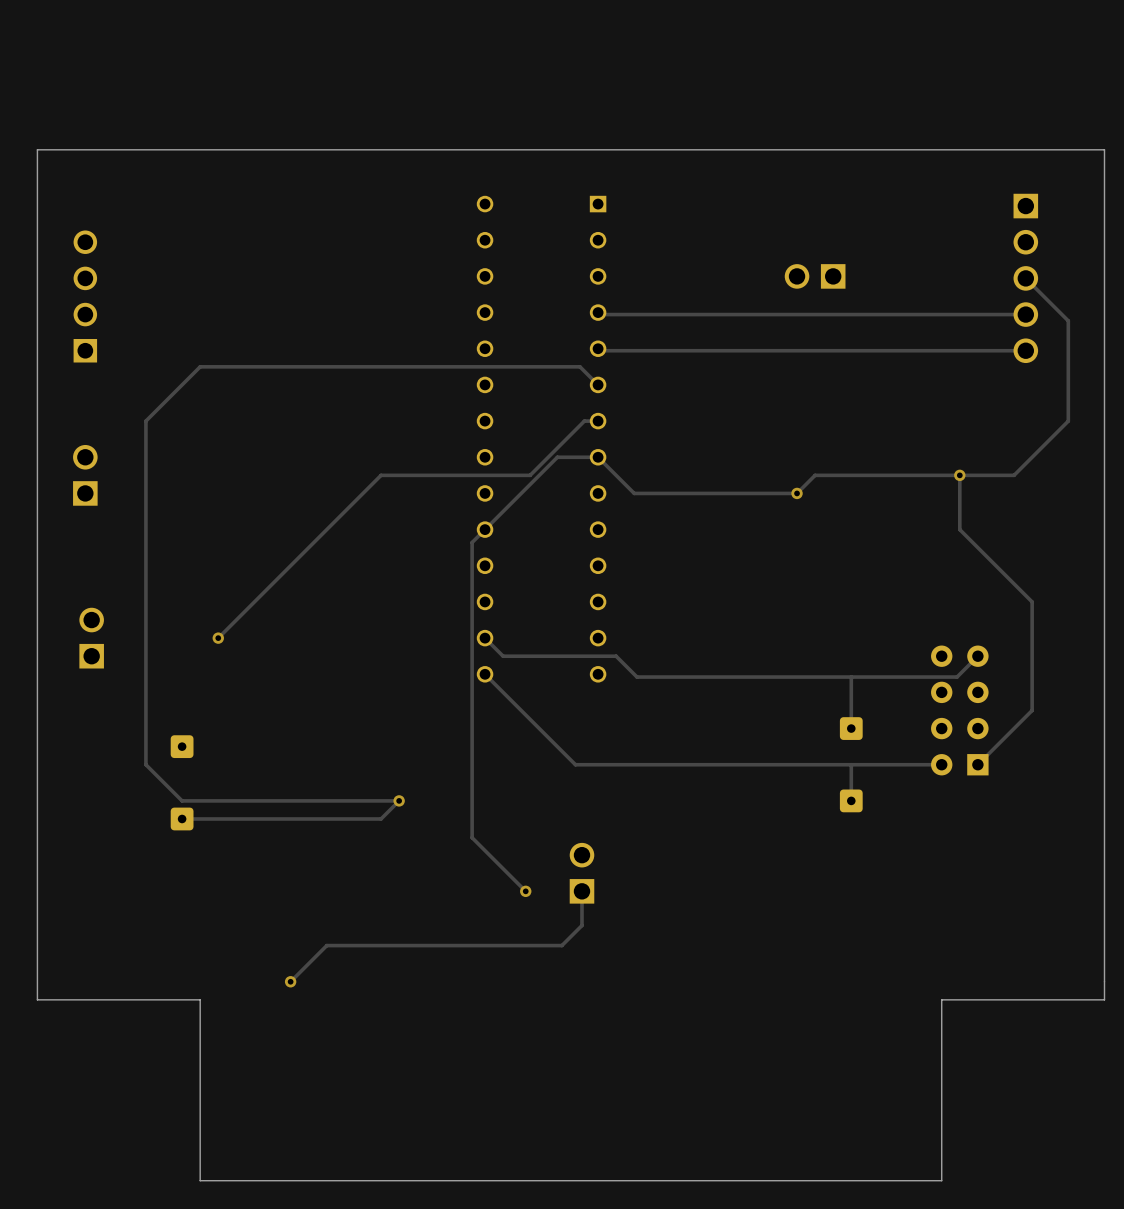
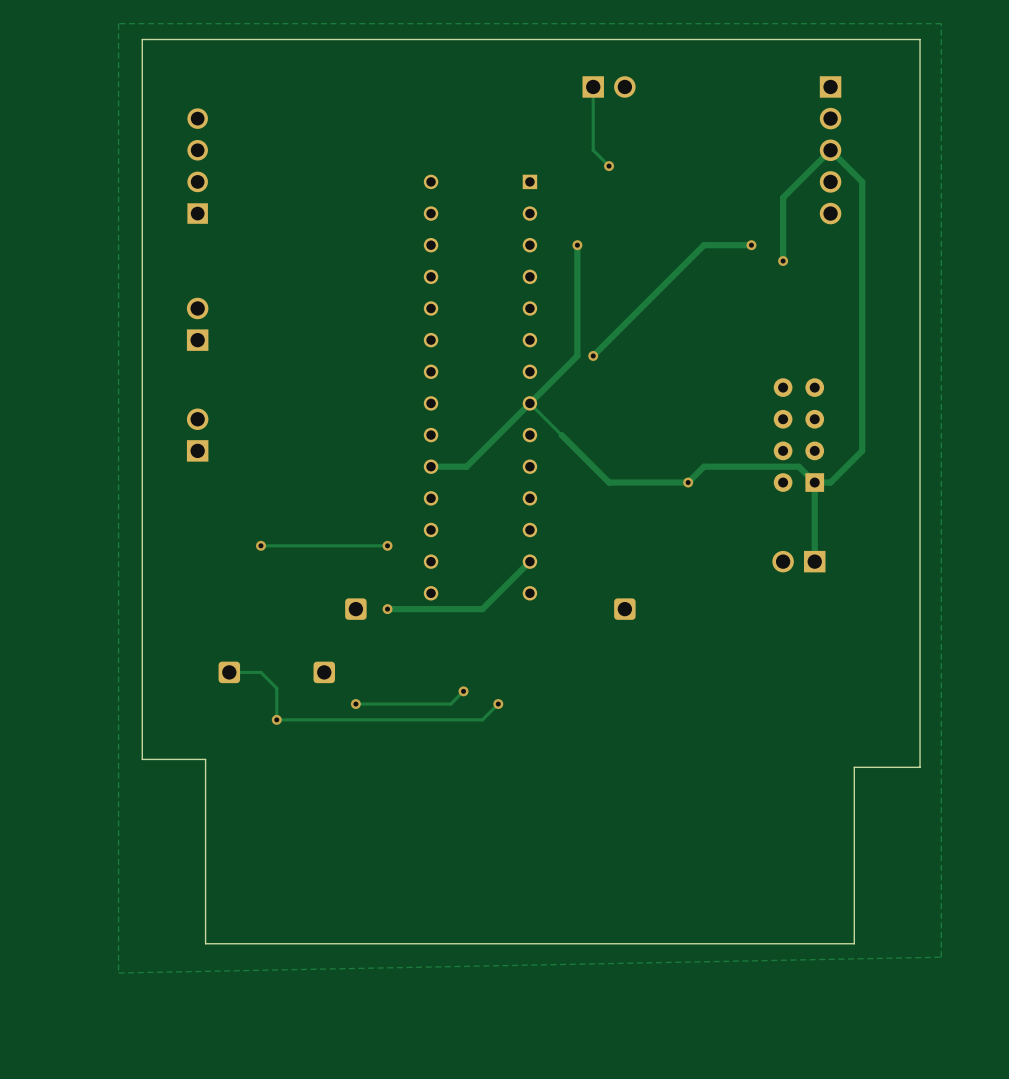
zone outline: none -> (941, 23) (118, 23) (118, 973) (941, 957) (941, 23)
track: none -> (593, 86) (593, 150) (609, 166)
part: none -> (609, 86)
board edge: (1104, 149) (1104, 999) (941, 999) (941, 1180) (200, 1180) (200, 999) (37, 999) (37, 149) (1104, 149) -> (920, 39) (920, 767) (854, 767) (854, 943) (205, 943) (205, 759) (142, 759) (142, 39) (920, 39)
via: none -> (609, 166)
track: none -> (577, 245) (577, 355) (466, 466) (431, 466)
via: none -> (577, 245)
part: (815, 276) -> none
track: none -> (751, 245) (703, 245) (593, 355)
via: none -> (751, 245)
track: (1025, 278) (1068, 320) (1068, 421) (1014, 475) (815, 475) (797, 493) (634, 493) -> (814, 482) (798, 466) (703, 466) (688, 482) (609, 482) (561, 435)
part position: (1025, 278) -> (830, 150)
track: none -> (783, 261) (783, 197) (830, 150) (862, 181) (862, 450) (830, 482) (814, 482)
via: none -> (783, 261)
part position: (85, 296) -> (197, 166)
track: (1025, 314) (600, 314) -> none
track: (1025, 350) (600, 350) -> none
part: none -> (197, 324)
track: (598, 384) (579, 366) (200, 366) (145, 421) (145, 764) (182, 800) (399, 800) (381, 818) -> (498, 704) (482, 719) (340, 719)
via: none -> (593, 355)
track: (598, 421) (584, 421) (530, 475) (381, 475) (218, 638) -> none
track: (598, 457) (557, 457) (472, 542) (472, 837) (525, 891) -> none
part: (85, 475) -> none
track: (959, 475) (959, 529) (1032, 601) (1032, 710) (977, 764) -> none
via: (959, 475) -> none
part: none -> (197, 435)
via position: (797, 493) -> (688, 482)
track: none -> (814, 482) (814, 561)
track: none -> (387, 545) (260, 545)
via: none -> (387, 545)
part: (91, 638) -> none
via position: (218, 638) -> (260, 545)
track: (485, 638) (503, 656) (616, 656) (637, 677) (957, 677) (977, 656) -> none
track: none -> (529, 561) (482, 609) (387, 609)
part: none -> (798, 561)
track: (485, 674) (575, 764) (941, 764) -> none
track: (851, 677) (851, 728) -> none
part: none -> (355, 609)
via: none -> (387, 609)
part: none -> (624, 609)
part position: (959, 710) -> (798, 435)
part: (851, 728) -> none
part: (182, 746) -> none
part: none -> (229, 672)
part: none -> (324, 672)
track: (851, 764) (851, 800) -> none
track: none -> (463, 691) (450, 704) (355, 704)
via: none -> (463, 691)
via: none -> (498, 704)
part: (851, 800) -> none
part: (182, 818) -> none
track: (308, 818) (182, 818) -> (276, 719) (276, 688) (260, 672) (229, 672)
via: none -> (276, 719)
part: (581, 873) -> none
via: (525, 891) -> none
track: (581, 891) (581, 925) (561, 945) (326, 945) (290, 981) -> none
via: (290, 981) -> none

